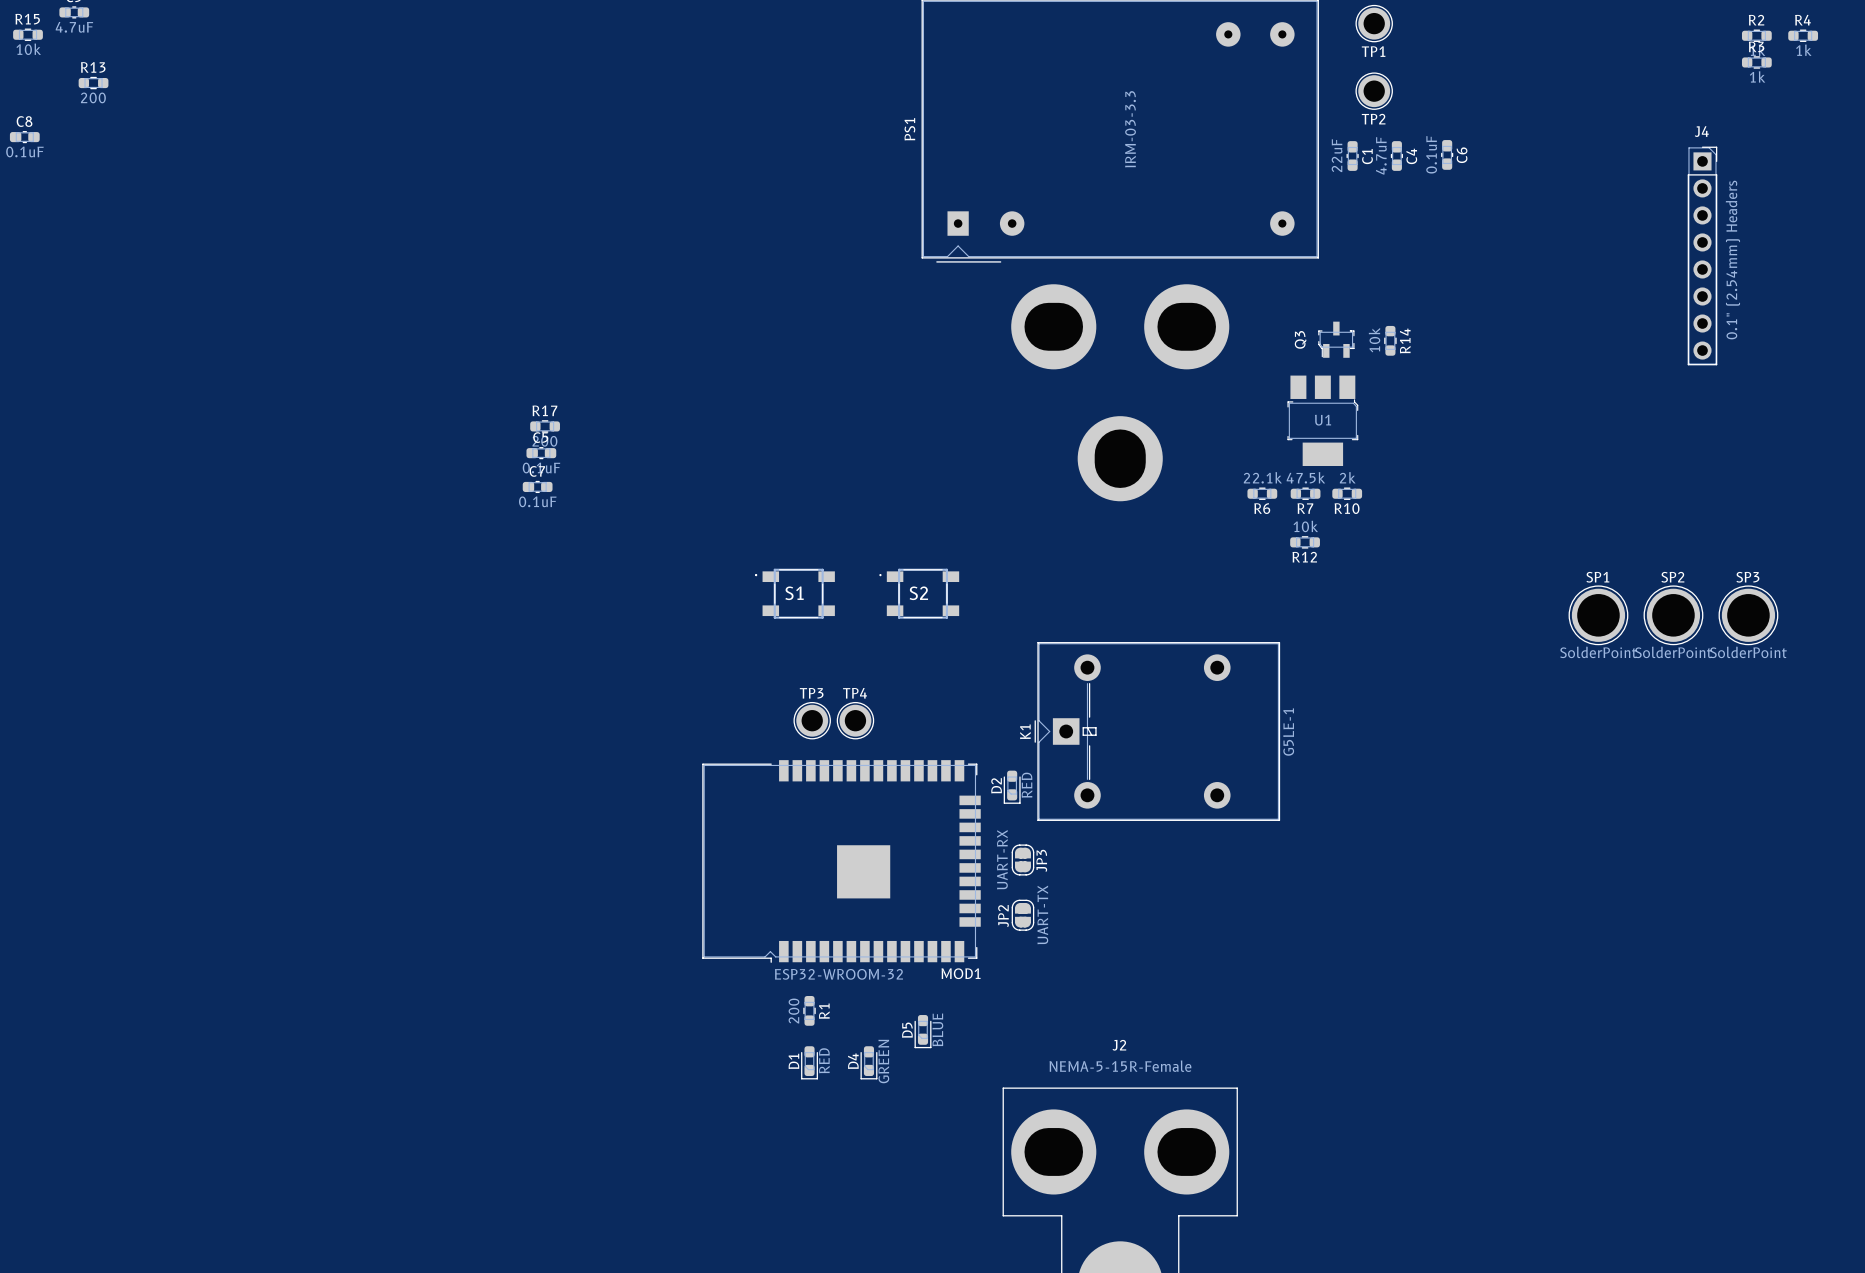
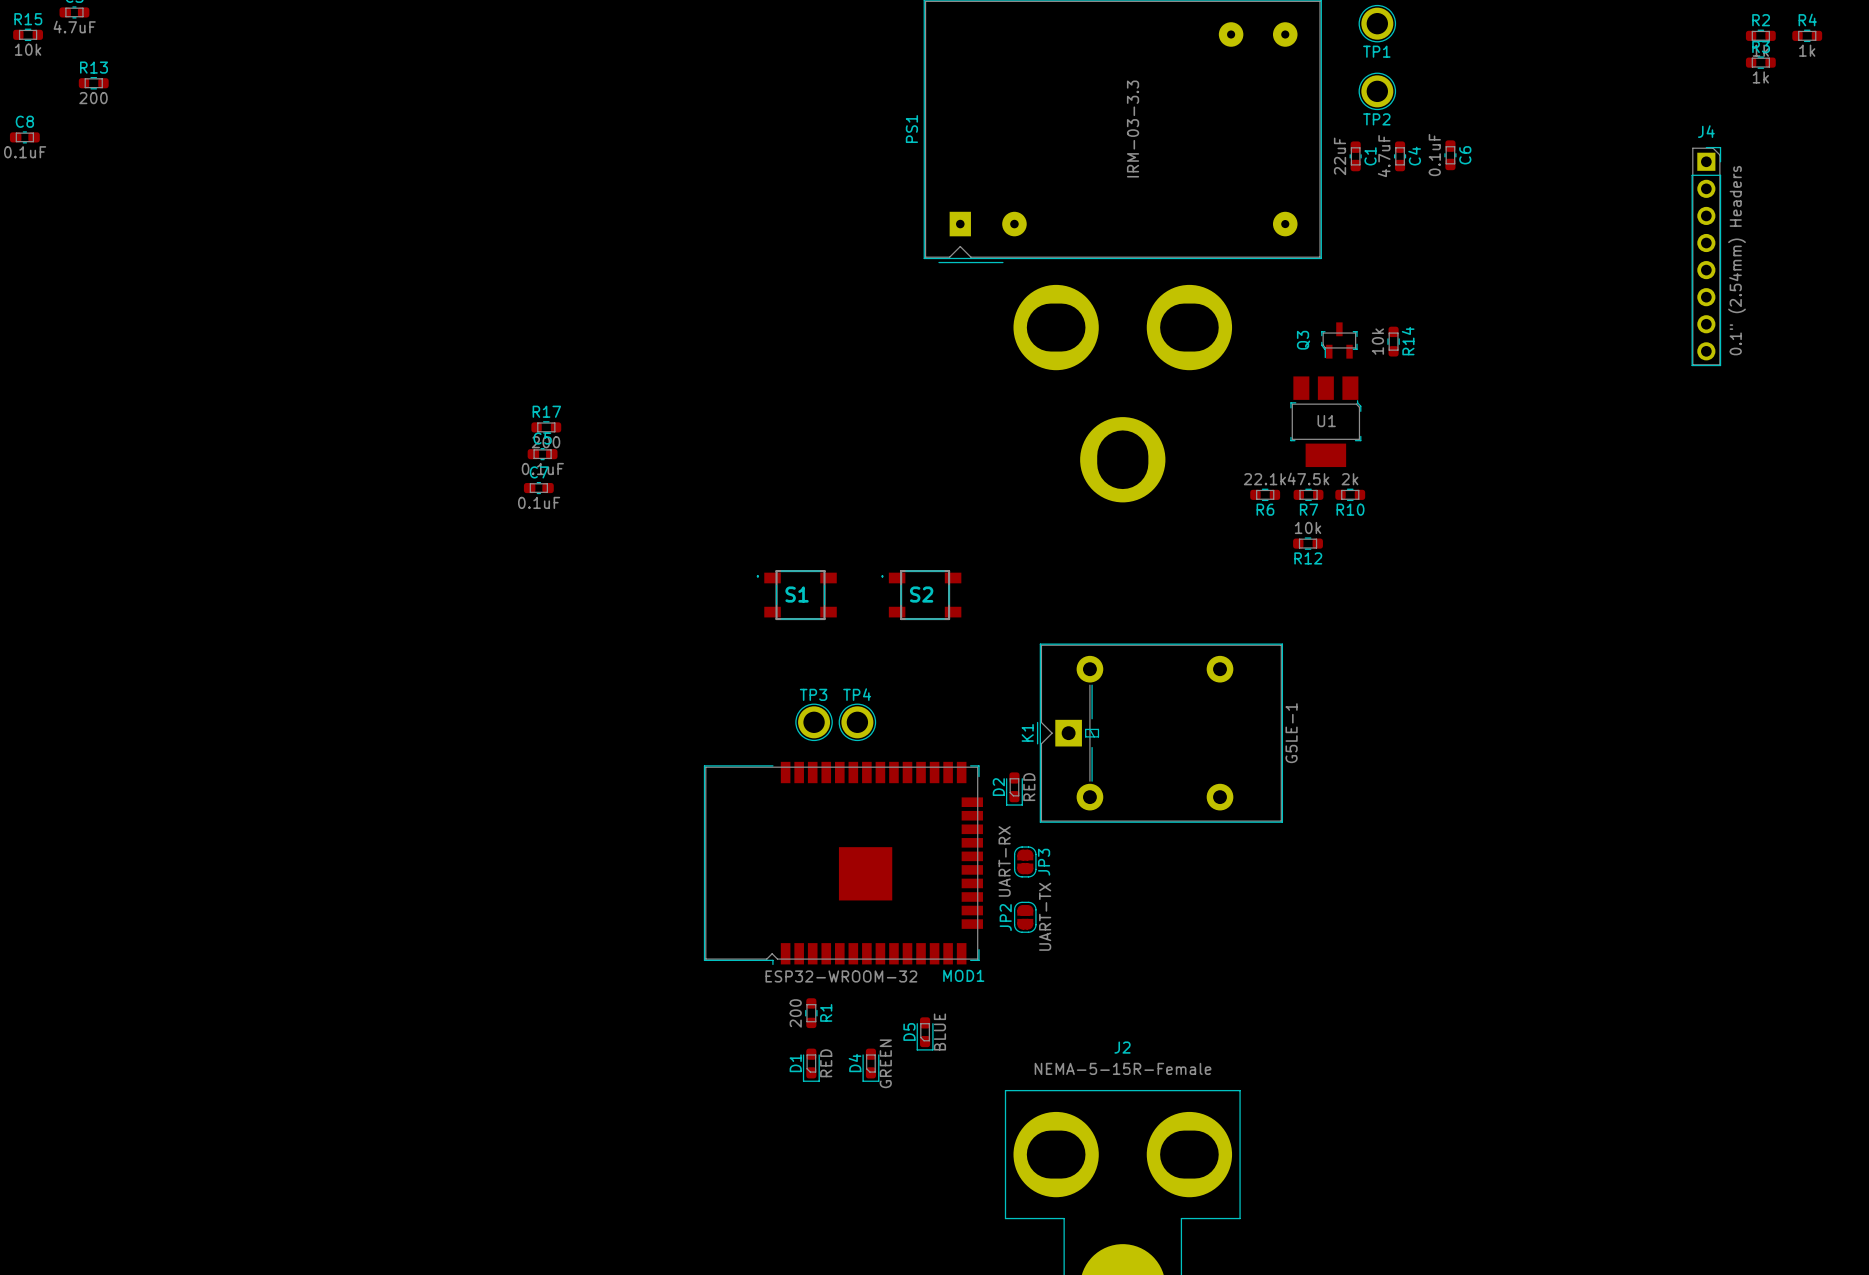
SP1: SolderPoint (1598, 615) -> none
SP2: SolderPoint (1673, 615) -> none
SP3: SolderPoint (1748, 615) -> none

